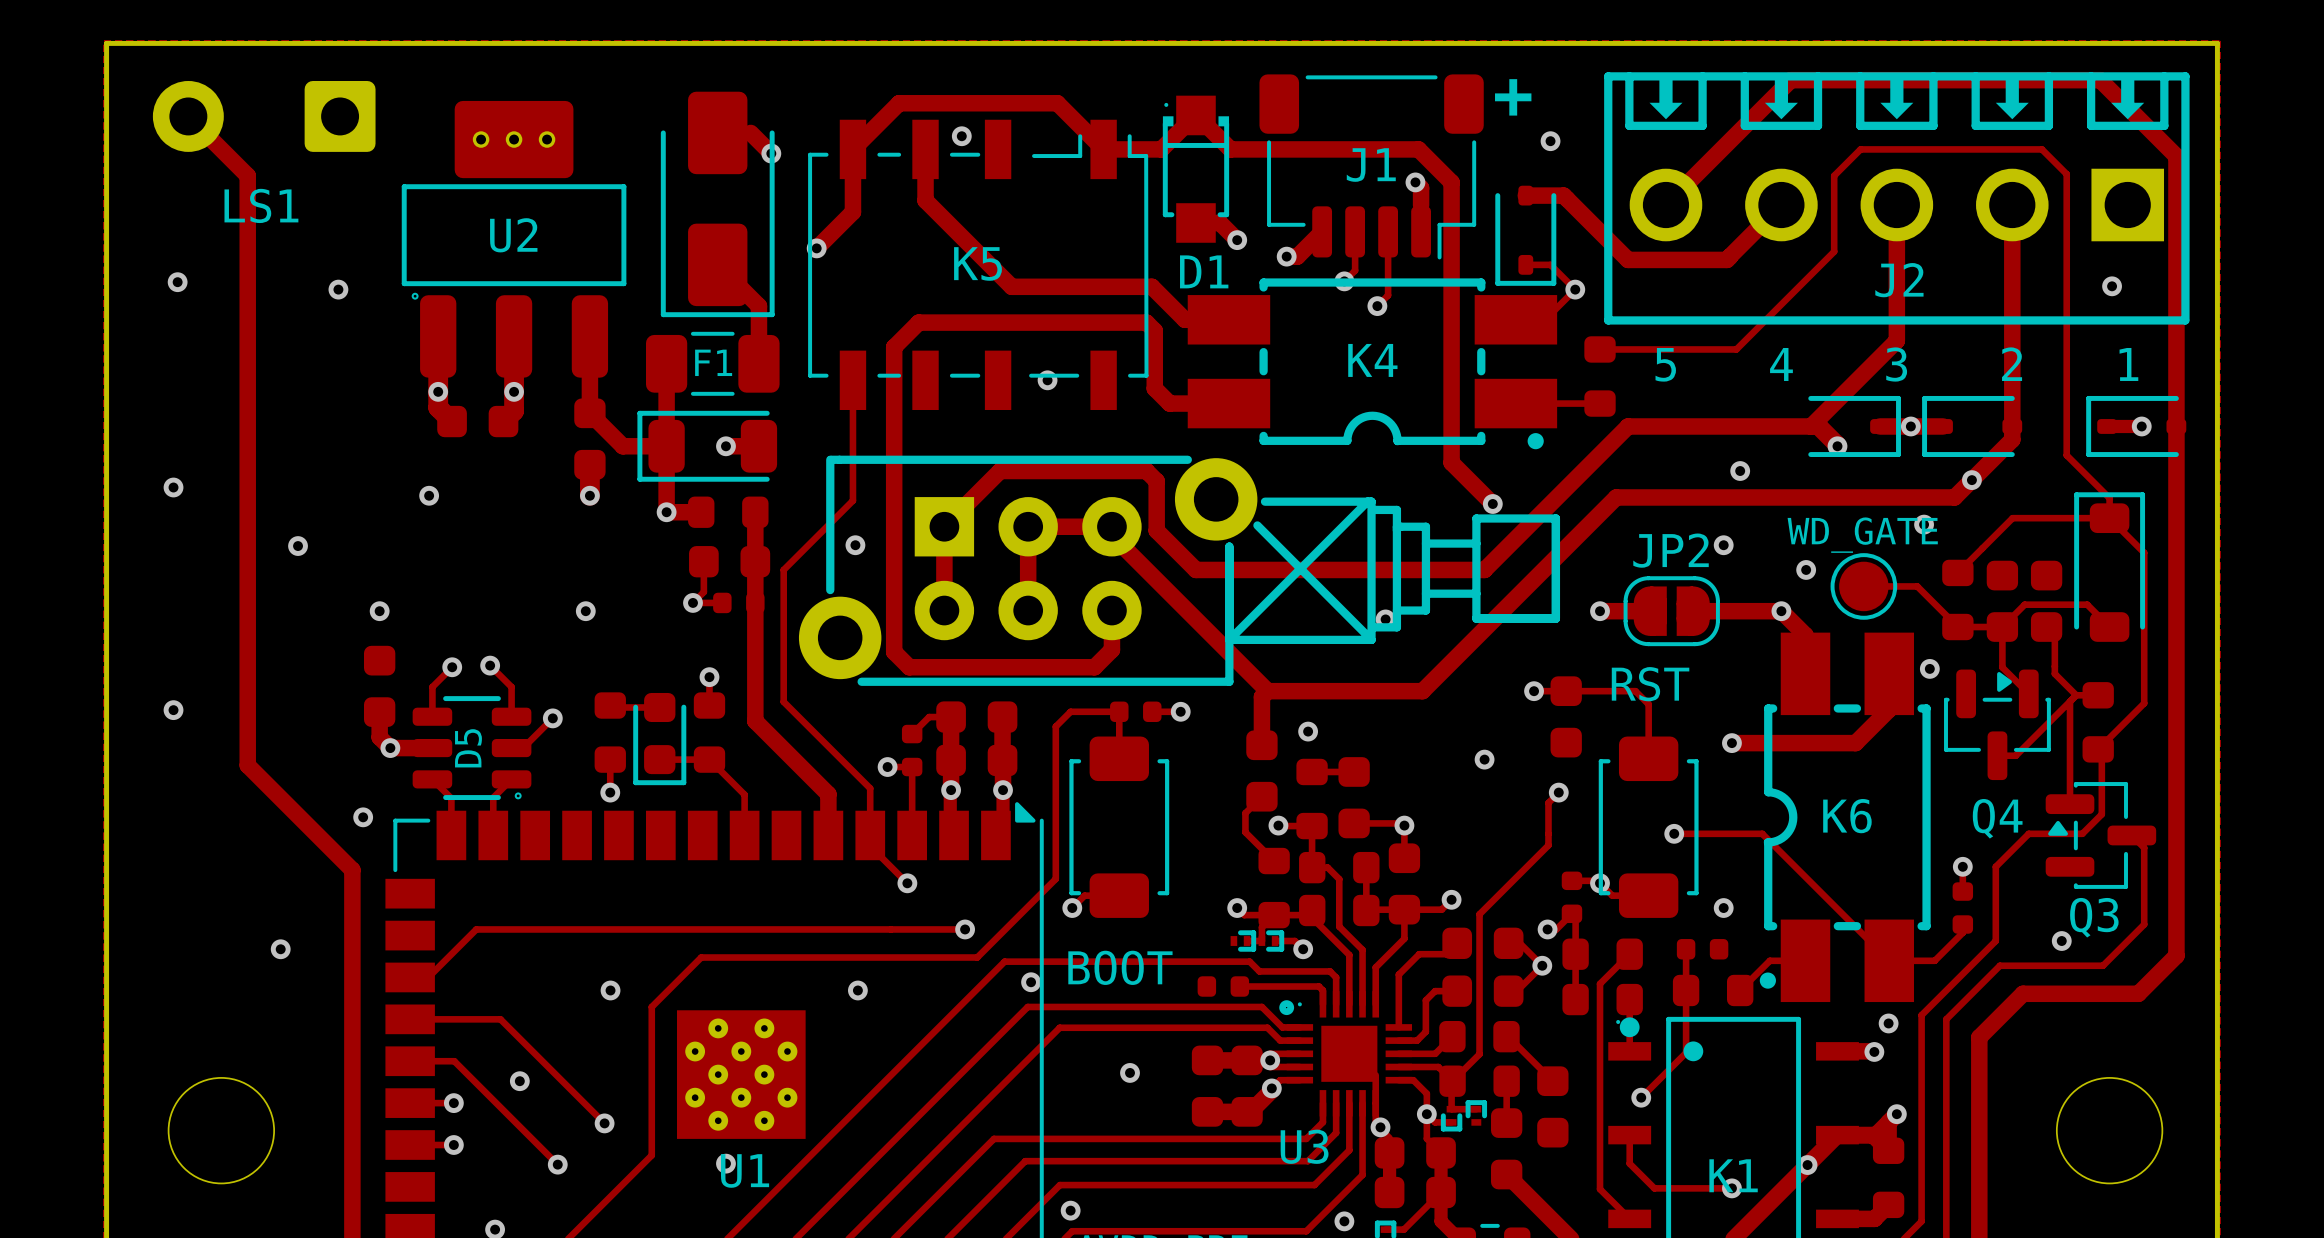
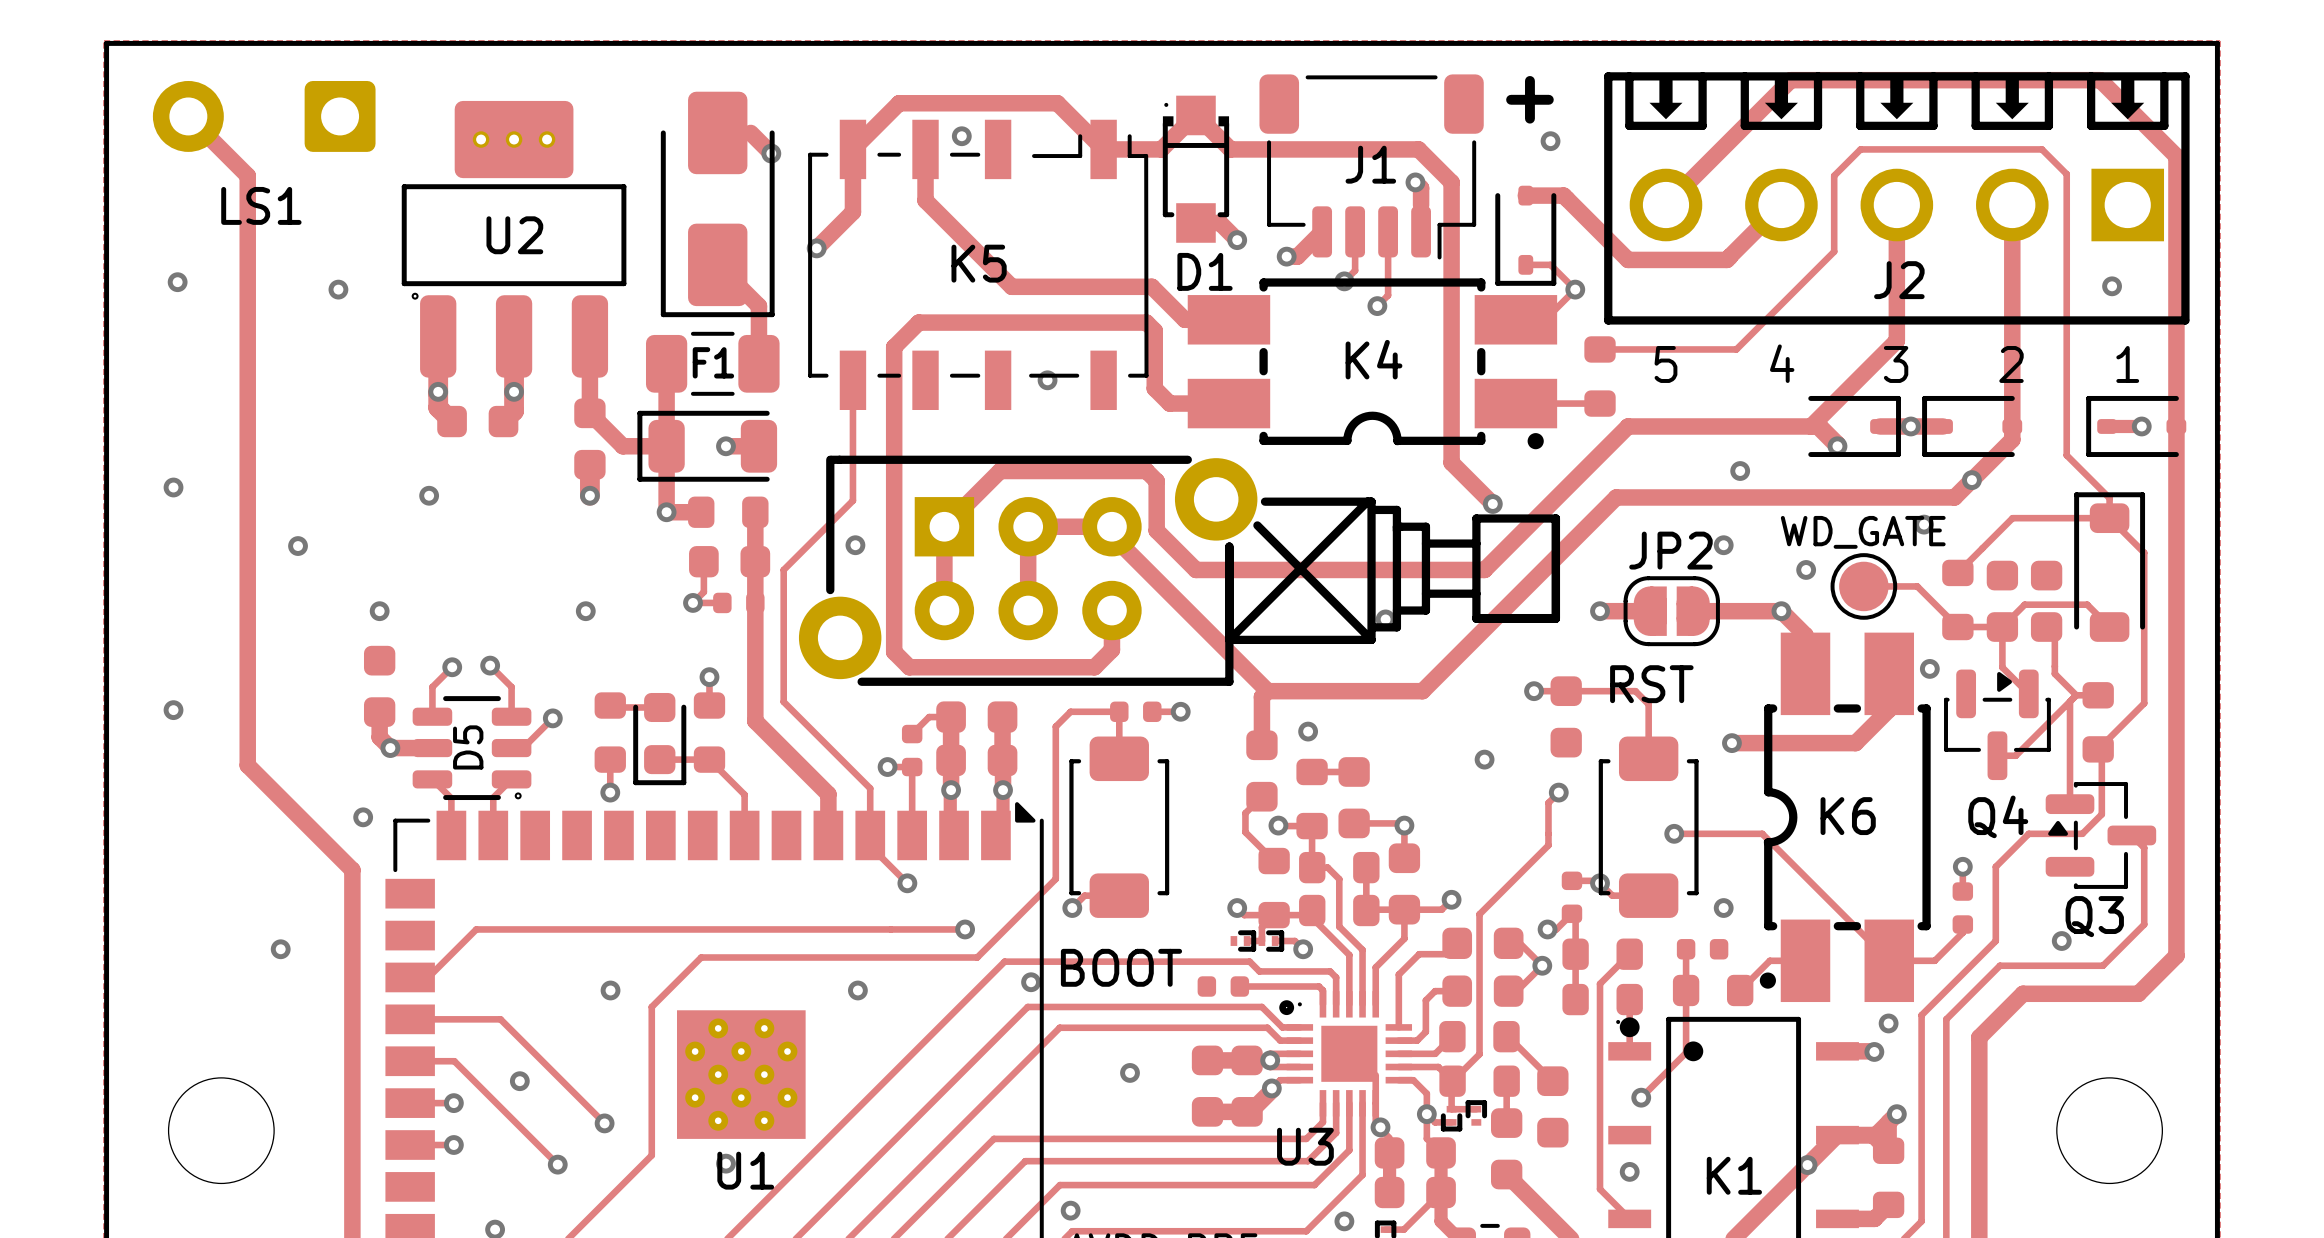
track: (1629, 1135) (1629, 1163) (1654, 1188) (1731, 1188) -> none
via: none -> (1629, 1171)
via: (1731, 1188) -> none

